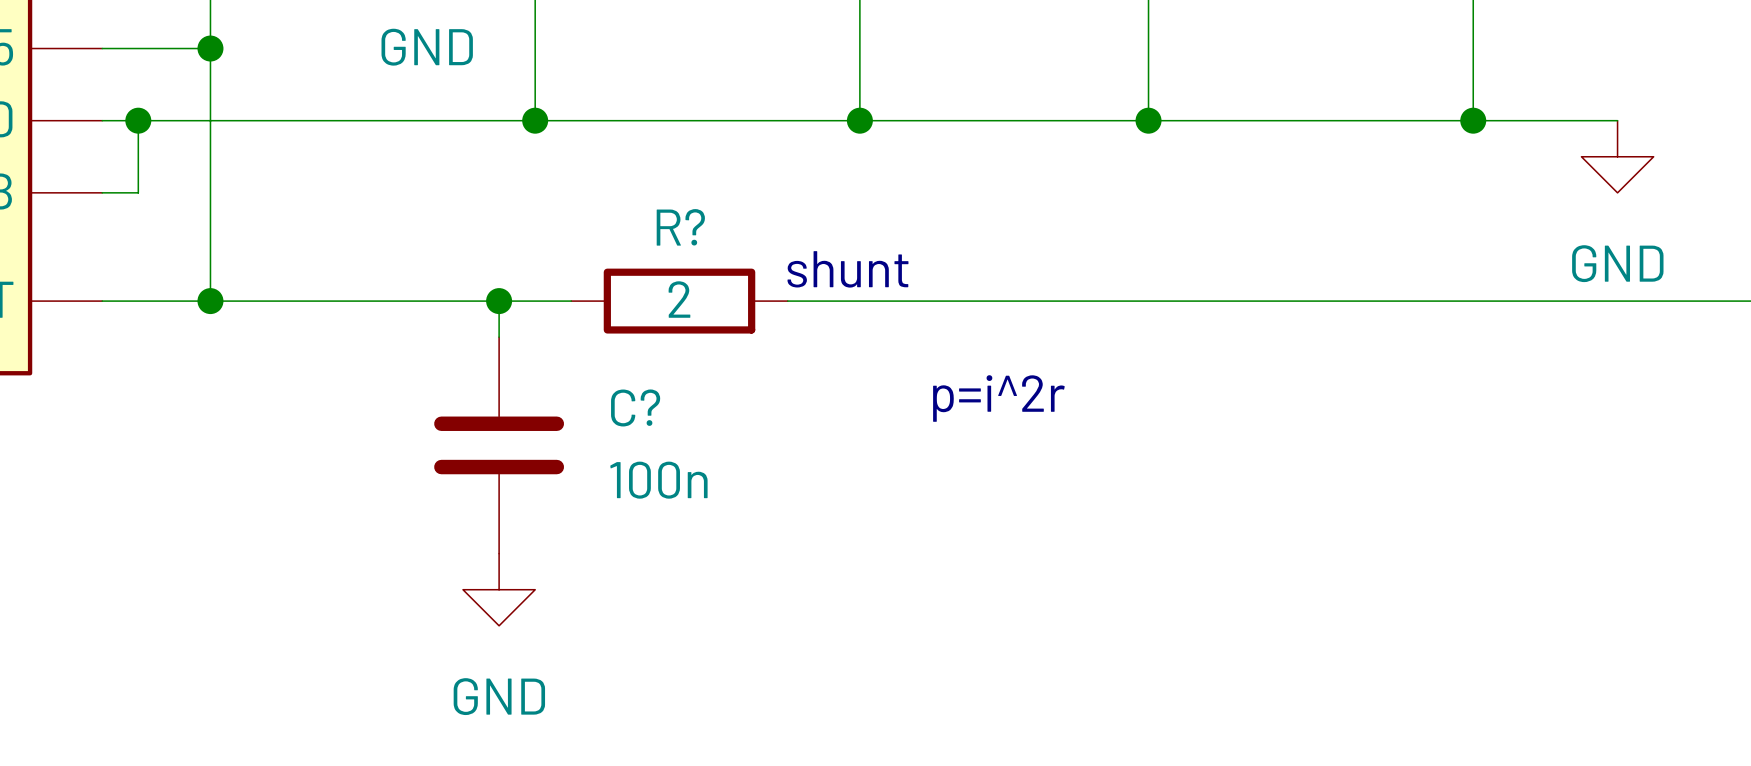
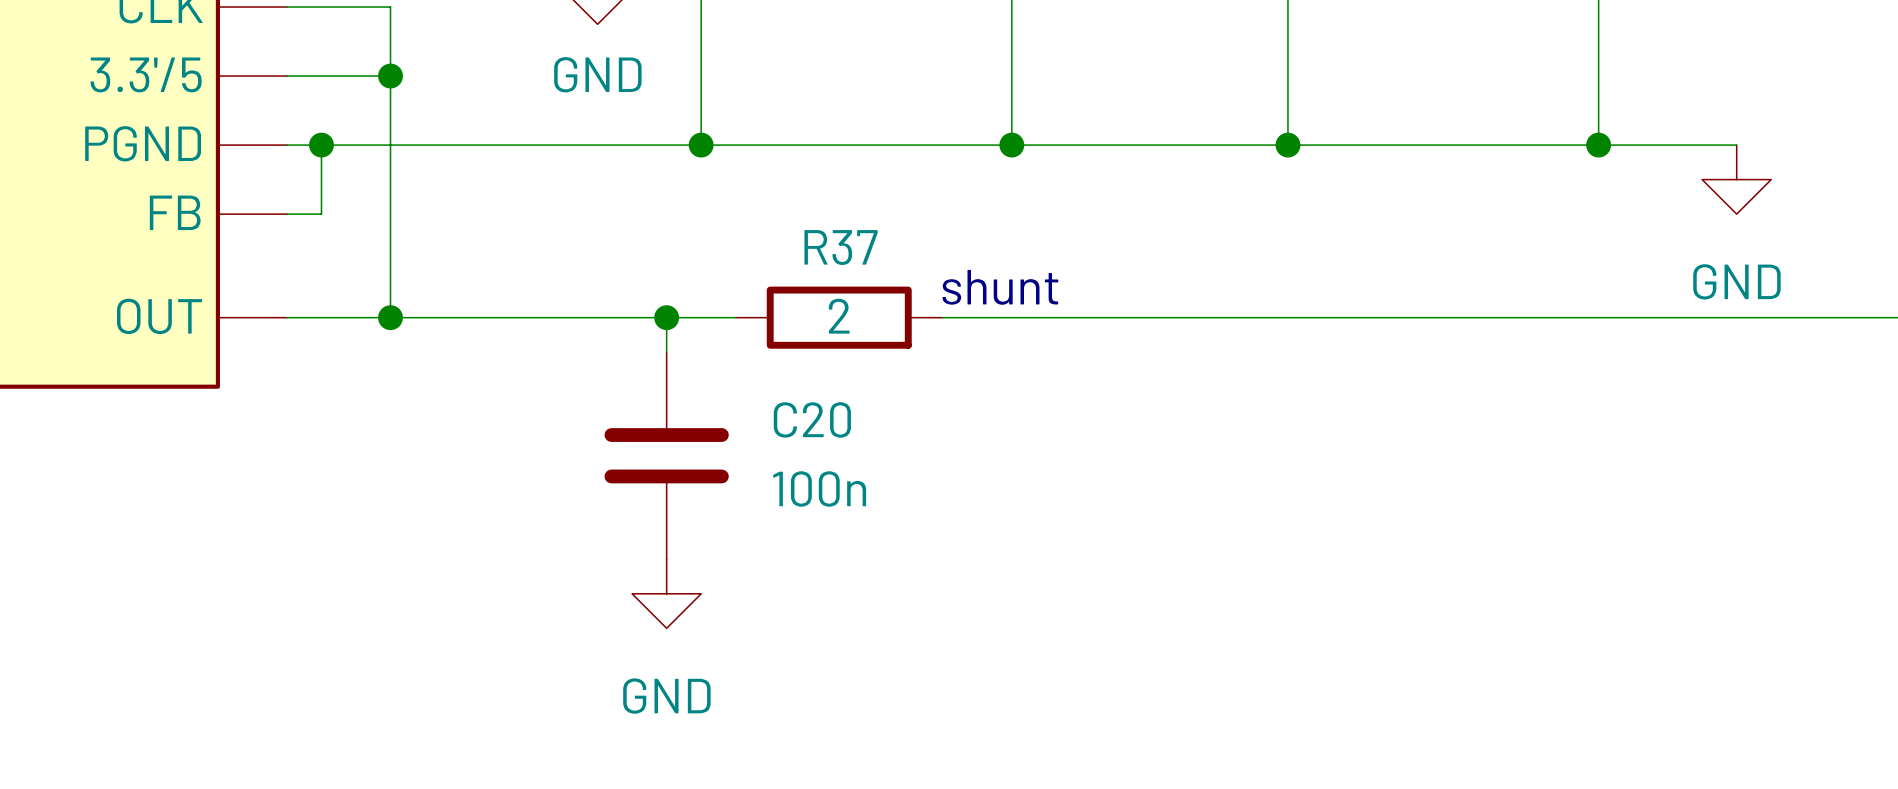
R? name: R? (680, 227) -> R37 (841, 247)
text: p=i^2r (998, 398) -> none
C? name: C? (635, 407) -> C20 (812, 419)

